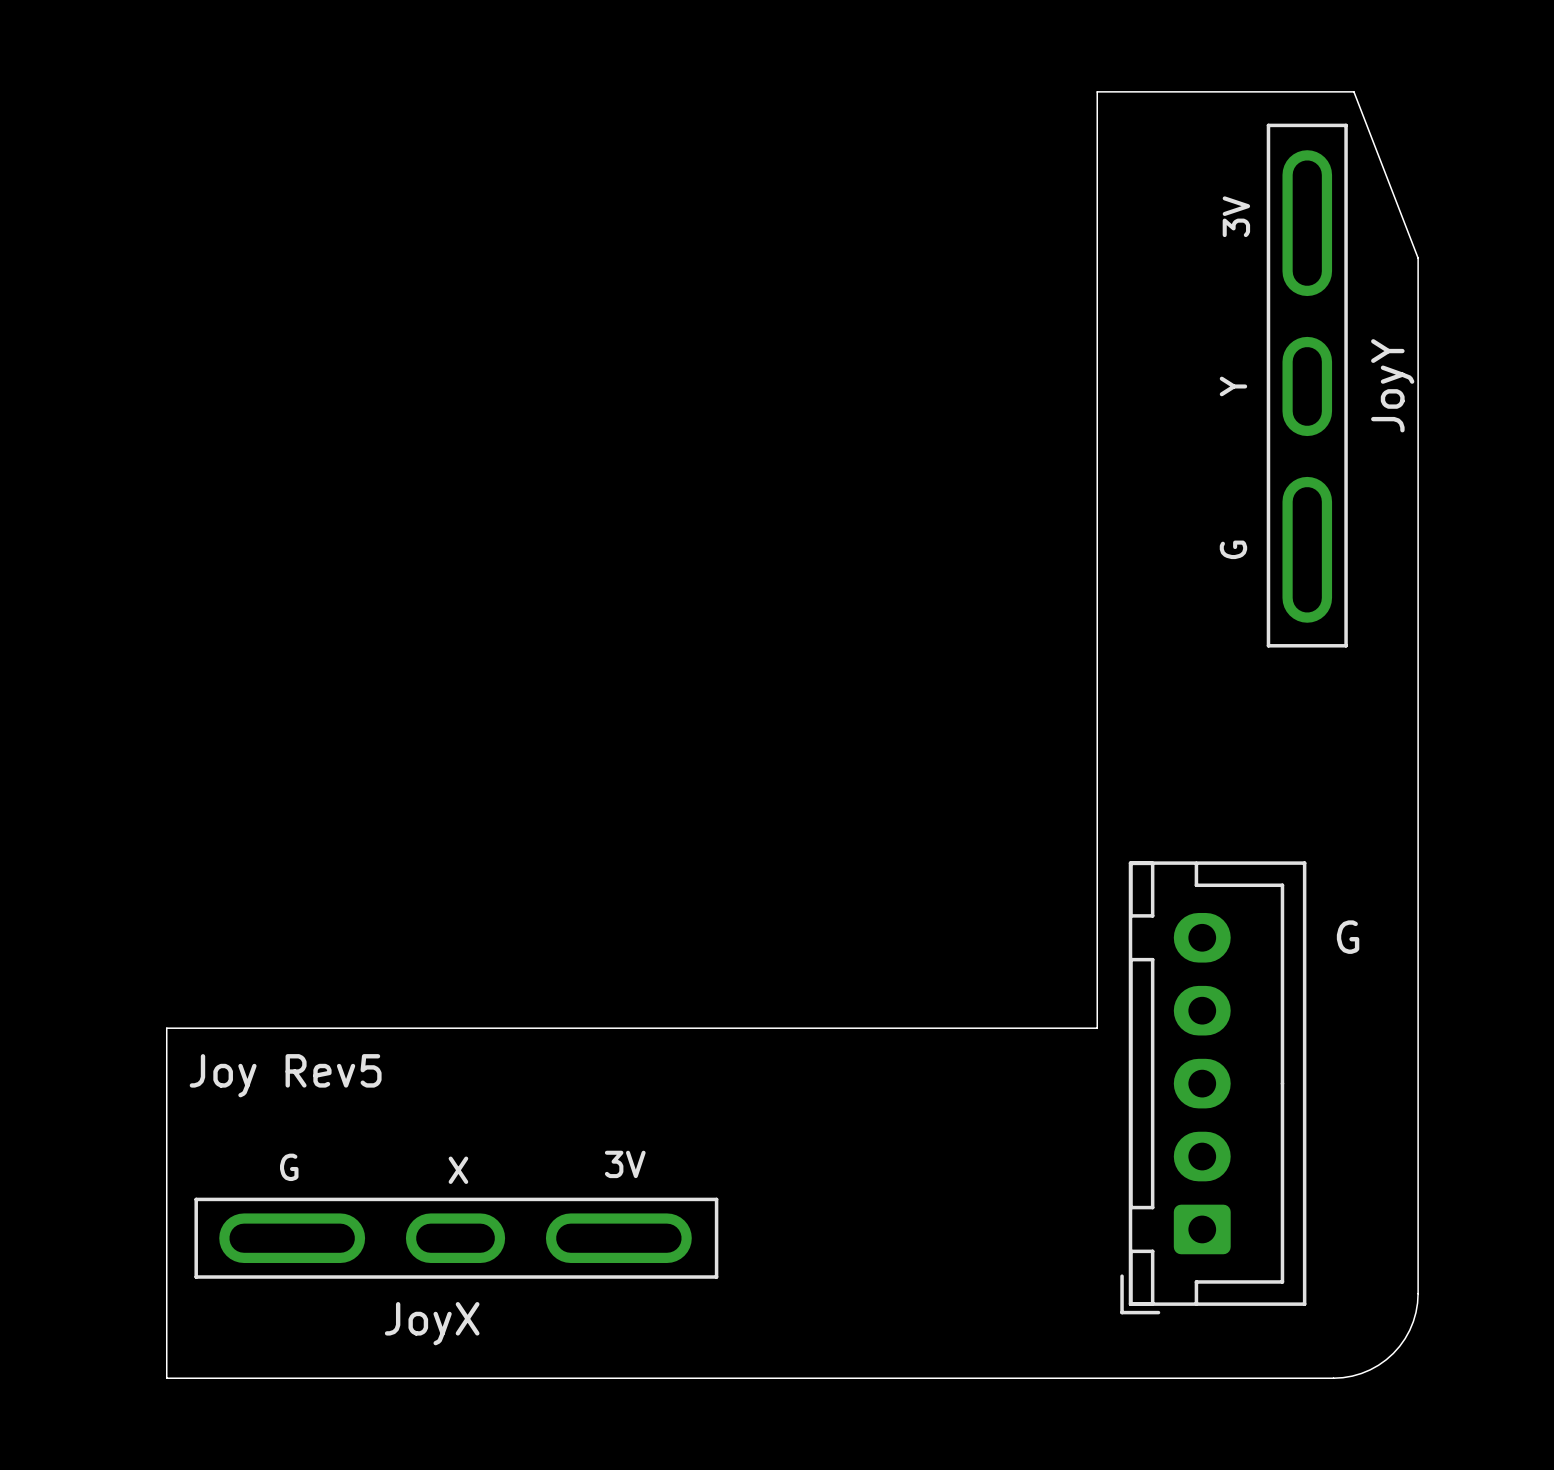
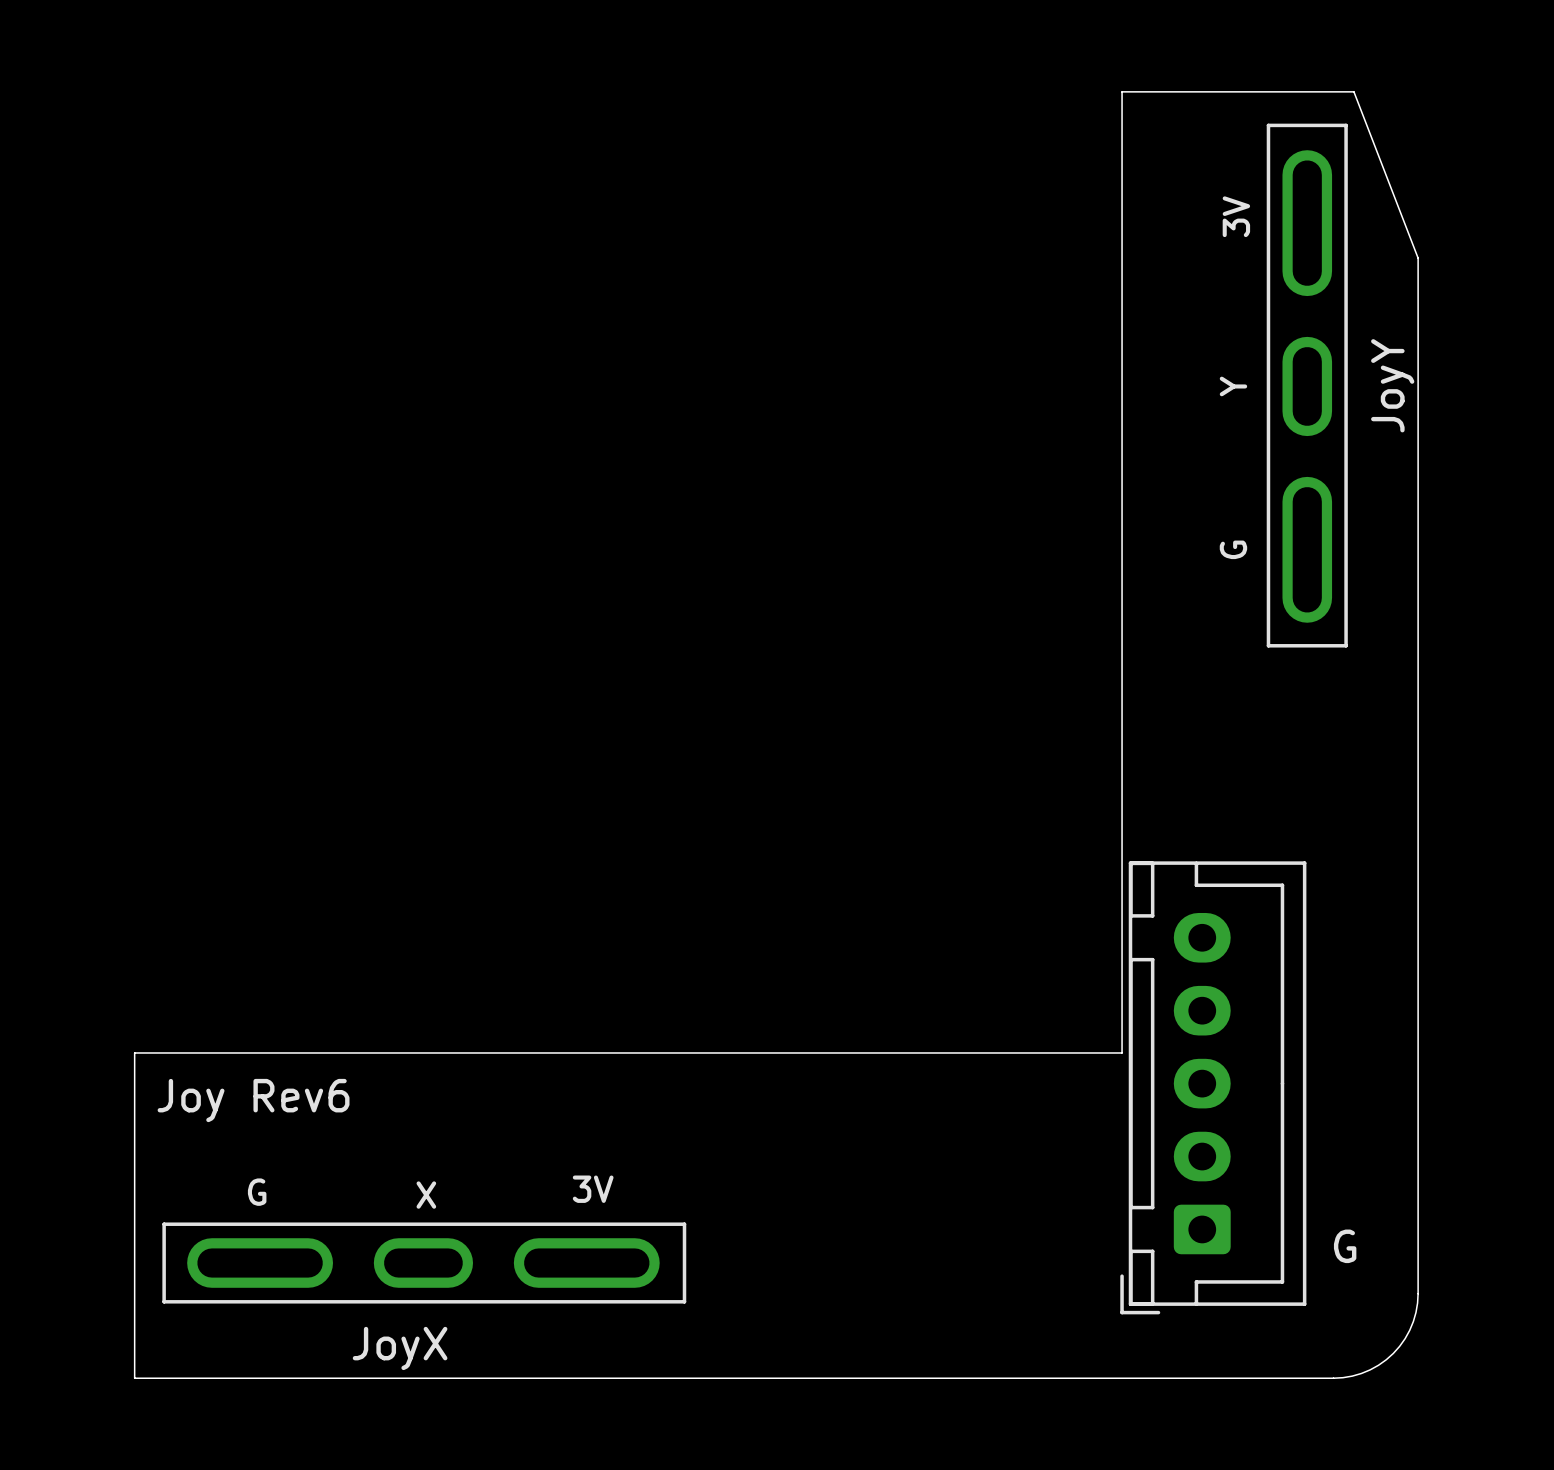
board edge: (1122, 91) (1097, 91) (1097, 1028) (166, 1028) (166, 1378) -> (1122, 91) (1122, 1052) (134, 1052) (134, 1378) (166, 1378)
text position: G (1348, 937) -> G (1345, 1246)
text: Joy Rev5 (285, 1075) -> Joy Rev6 (253, 1100)
text position: 3V (625, 1164) -> 3V (593, 1189)
text position: G (289, 1167) -> G (257, 1192)
text position: X (458, 1170) -> X (426, 1195)
part position: (456, 1238) -> (424, 1263)

